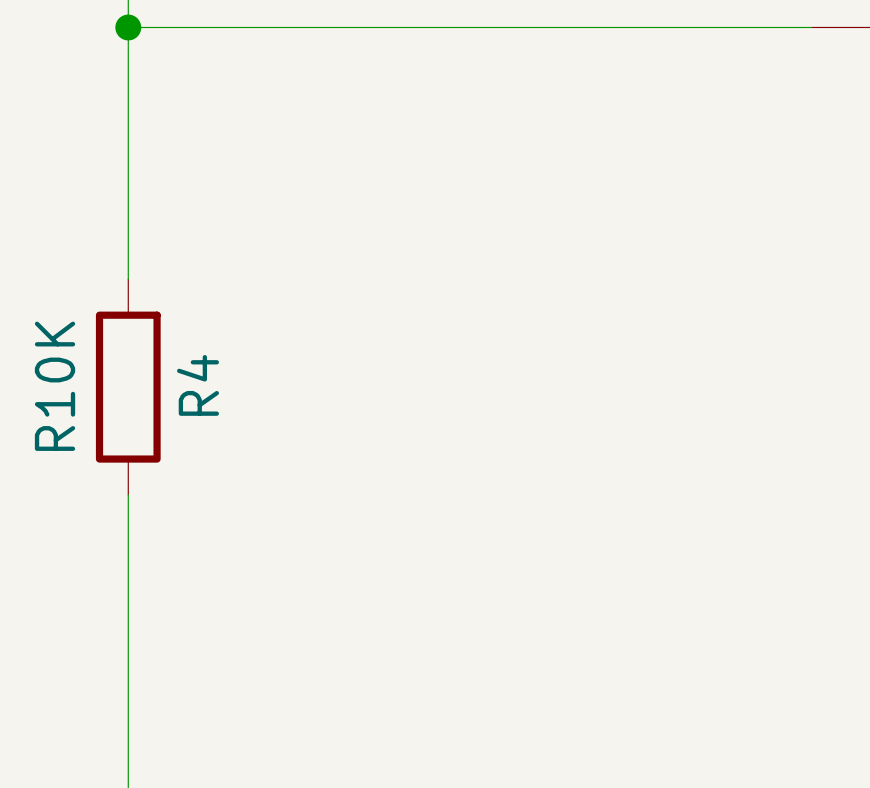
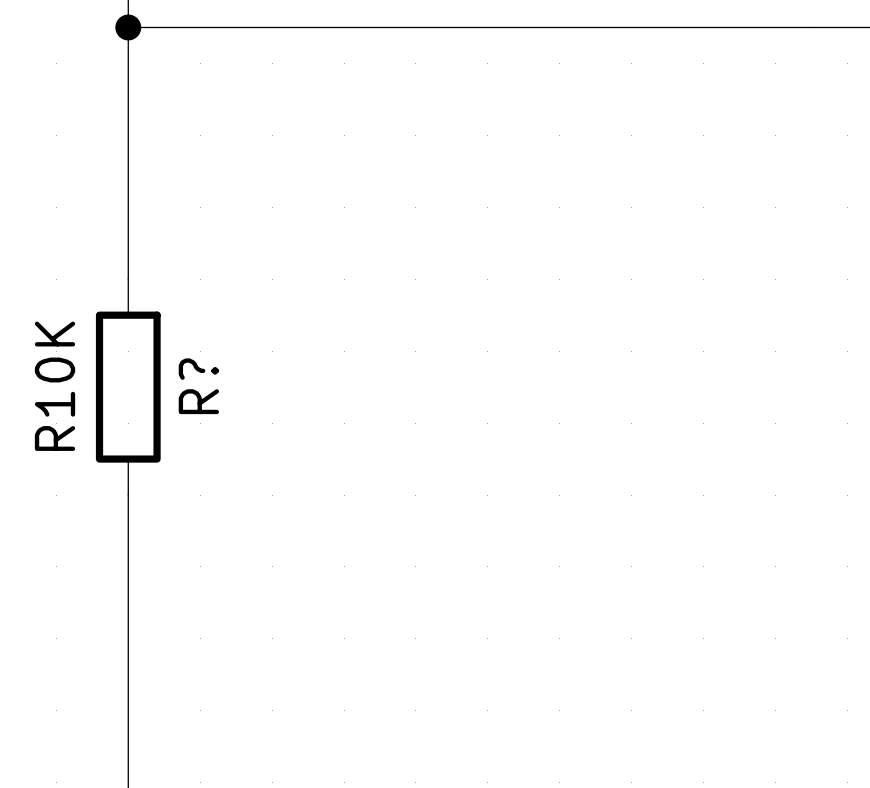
R4 name: R4 (198, 385) -> R? (198, 386)

